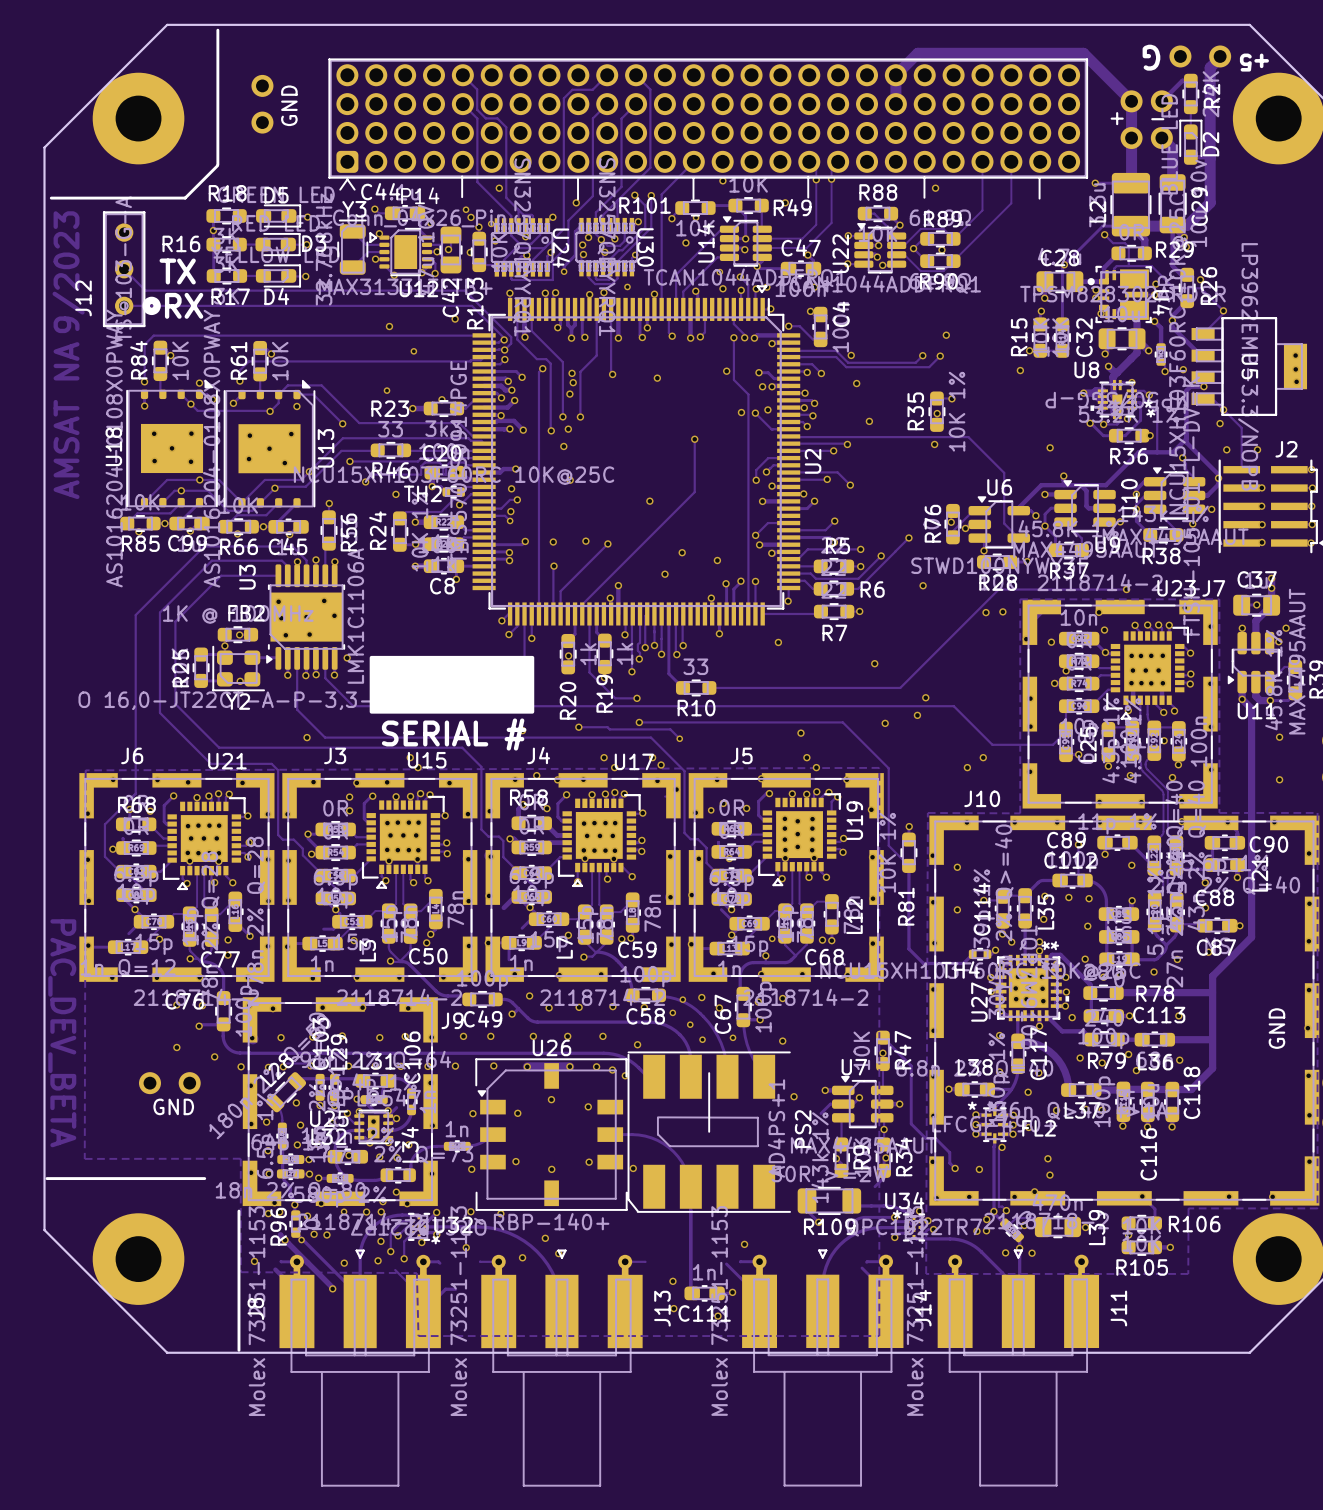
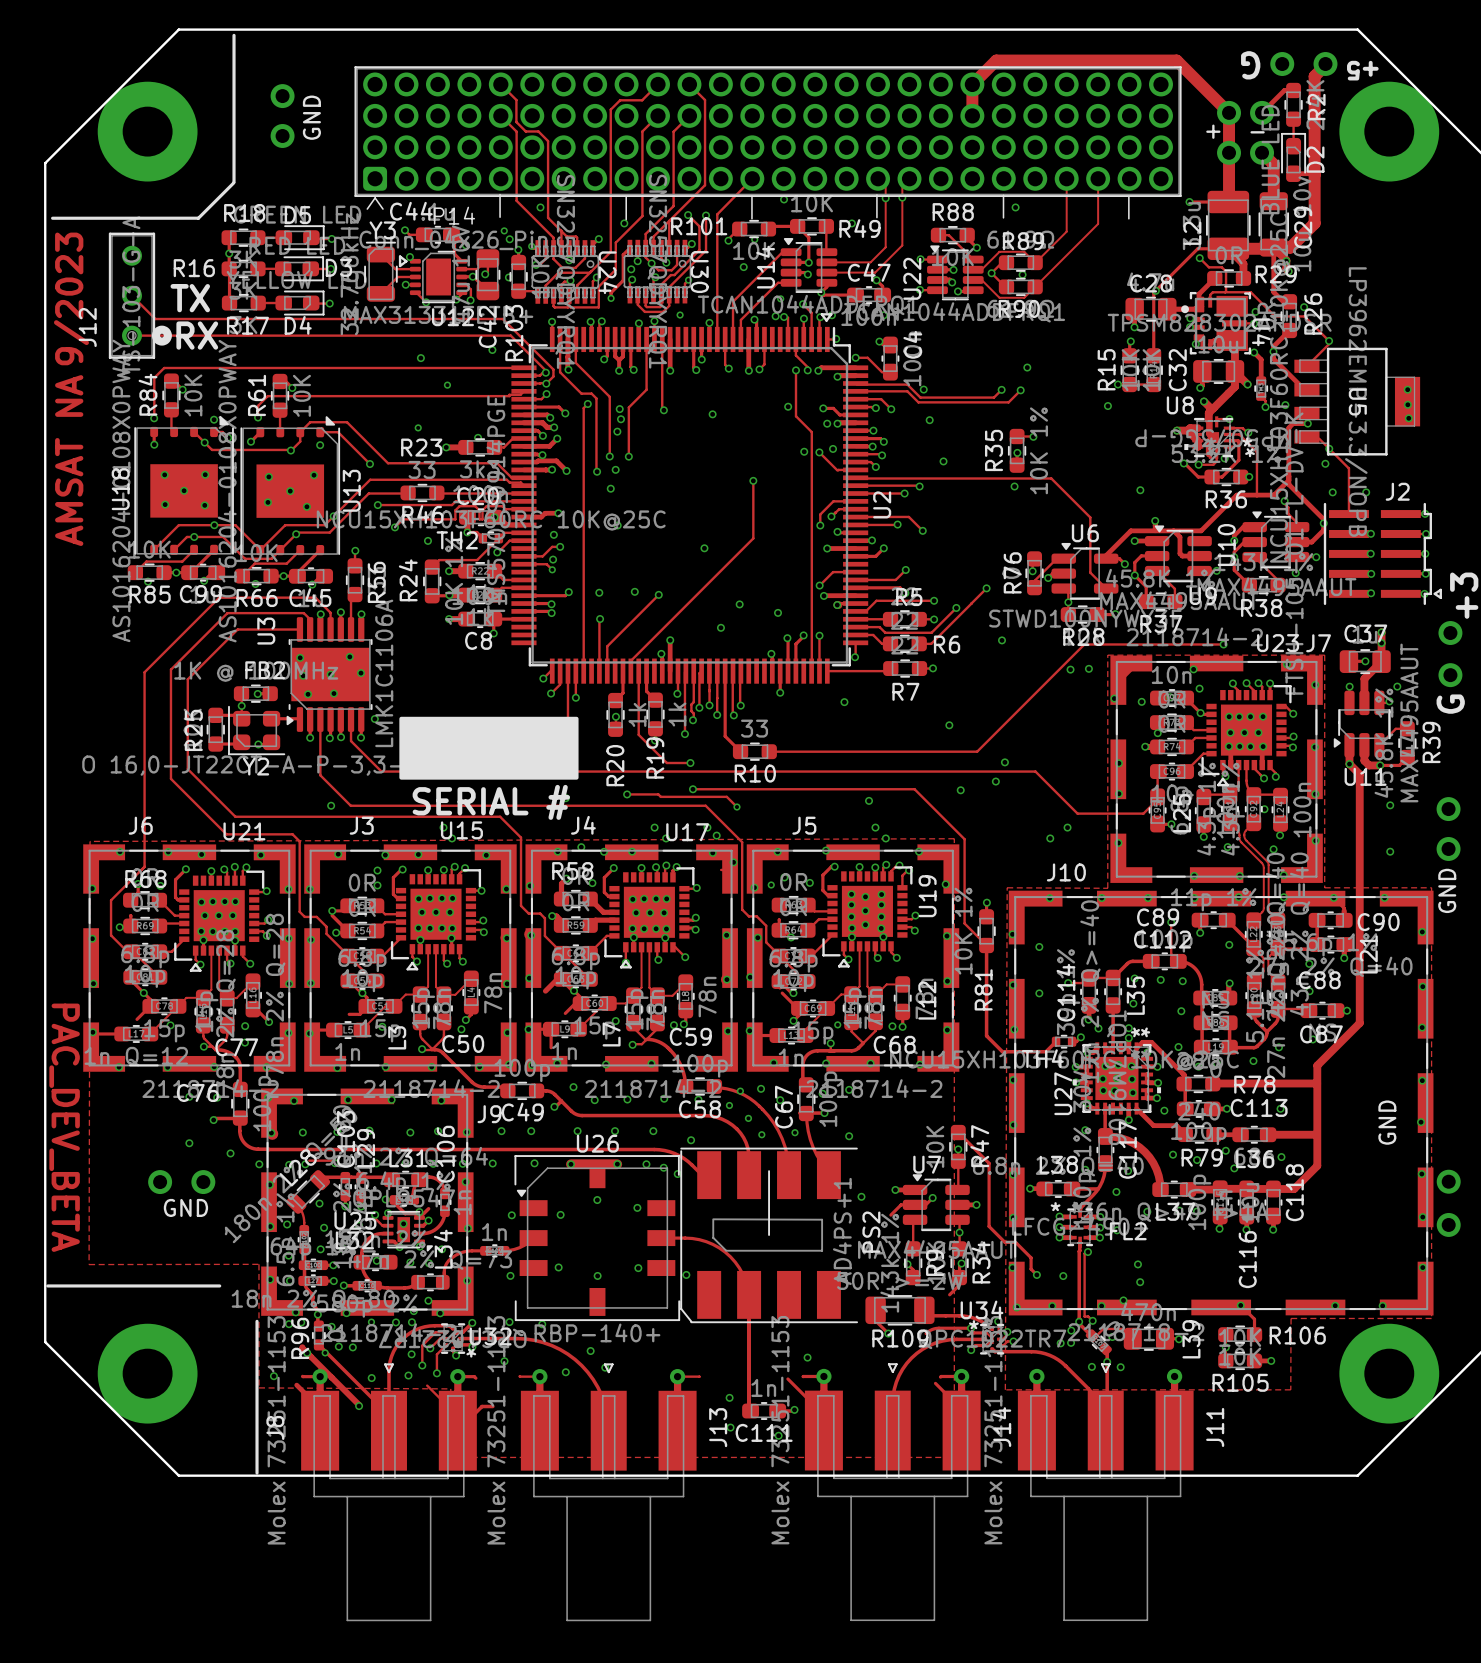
via: none -> (775, 316)
track: none -> (788, 317) (788, 339)

